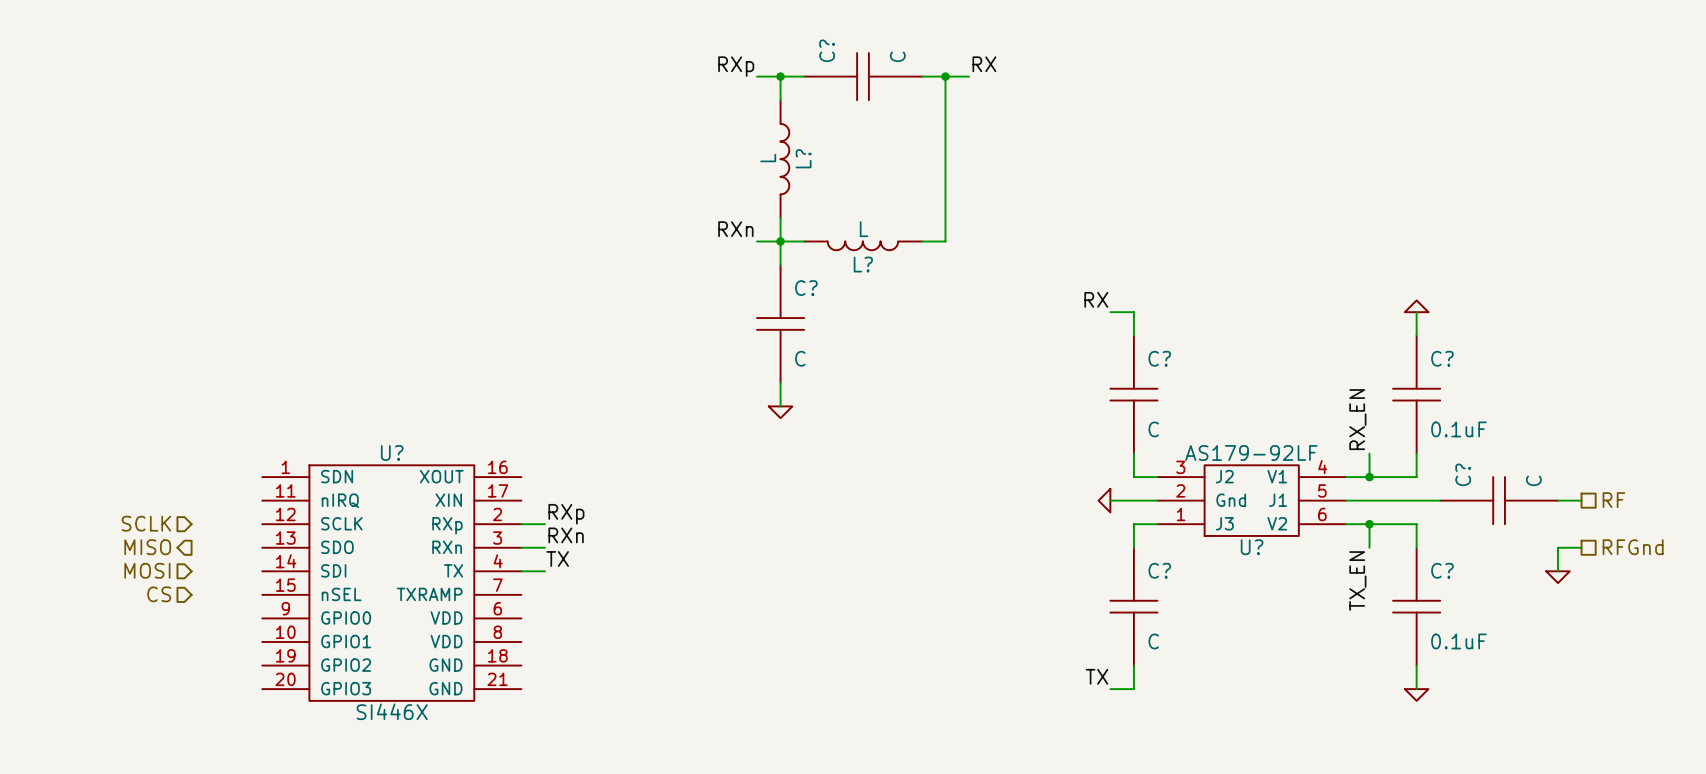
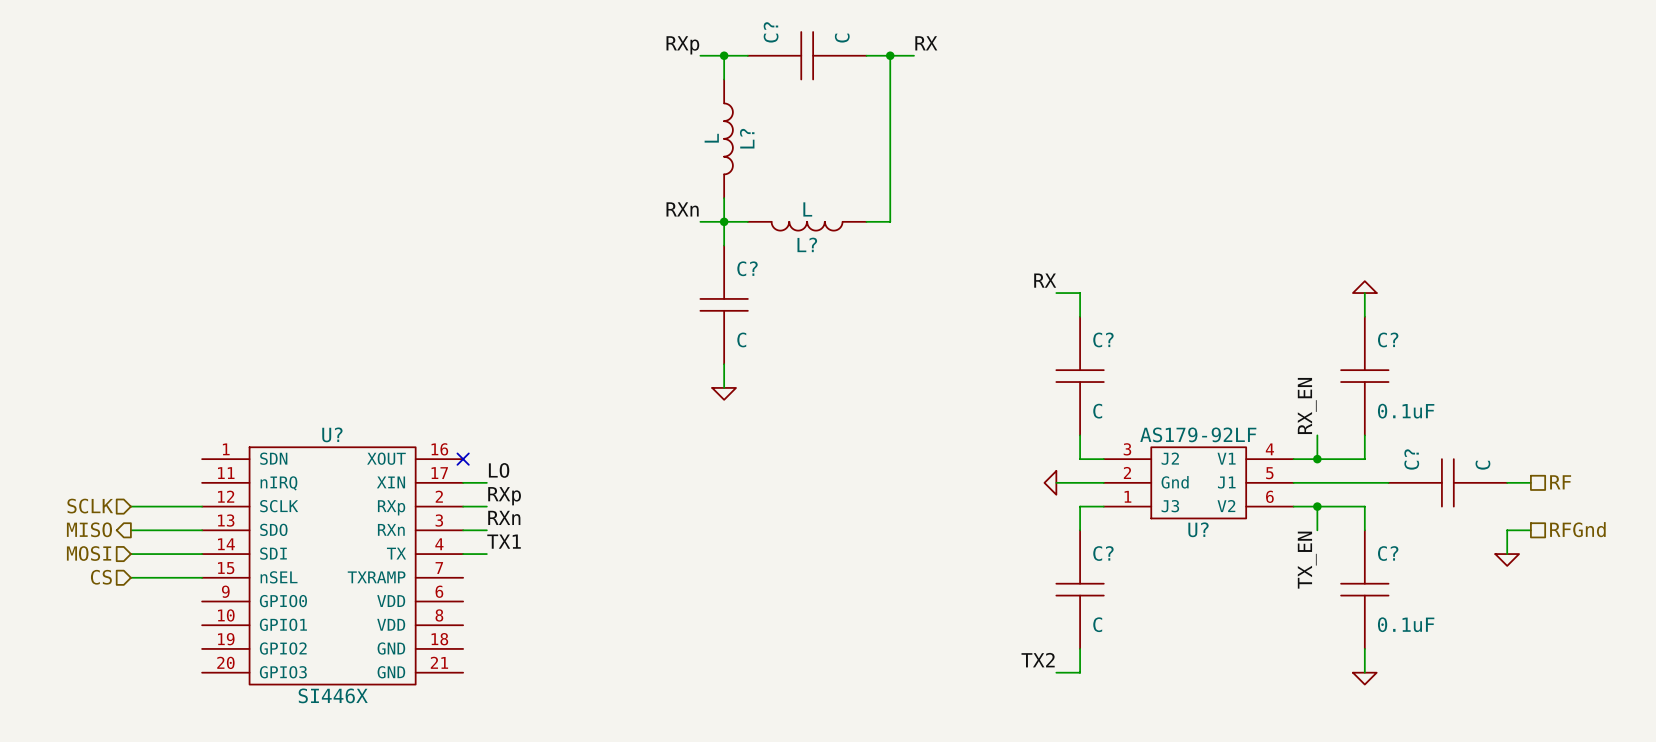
no-connect mark: none -> (463, 459)
label: none -> LO (499, 470)
wire: none -> (463, 482) (486, 482)
wire: none -> (130, 506) (202, 506)
wire: none -> (130, 530) (202, 530)
label: TX (557, 558) -> TX1 (504, 541)
wire: none -> (130, 554) (202, 554)
wire: none -> (130, 577) (202, 577)
label: TX (1096, 676) -> TX2 (1038, 660)

